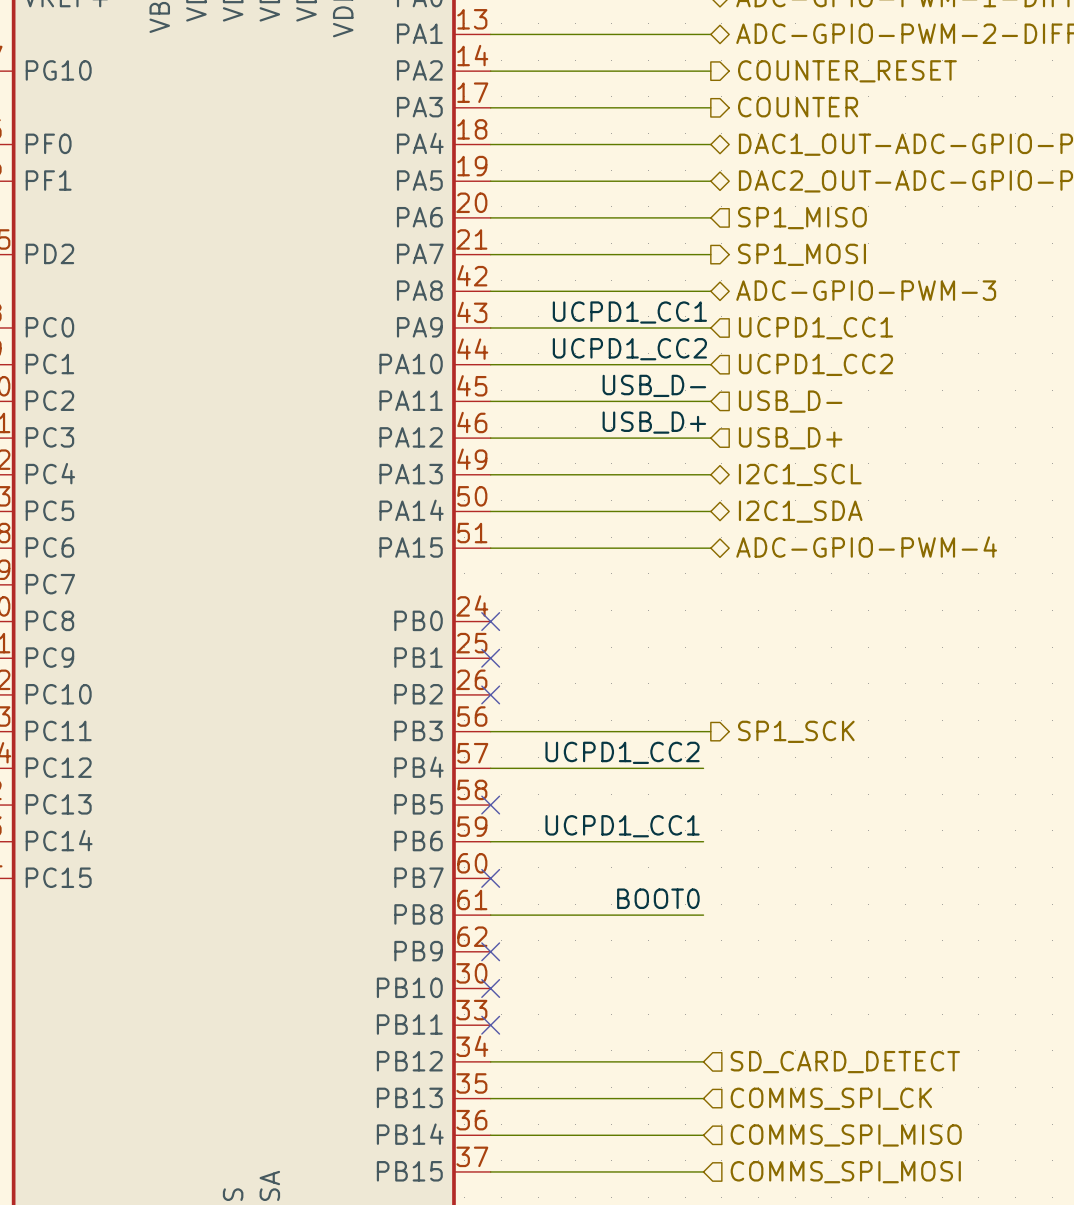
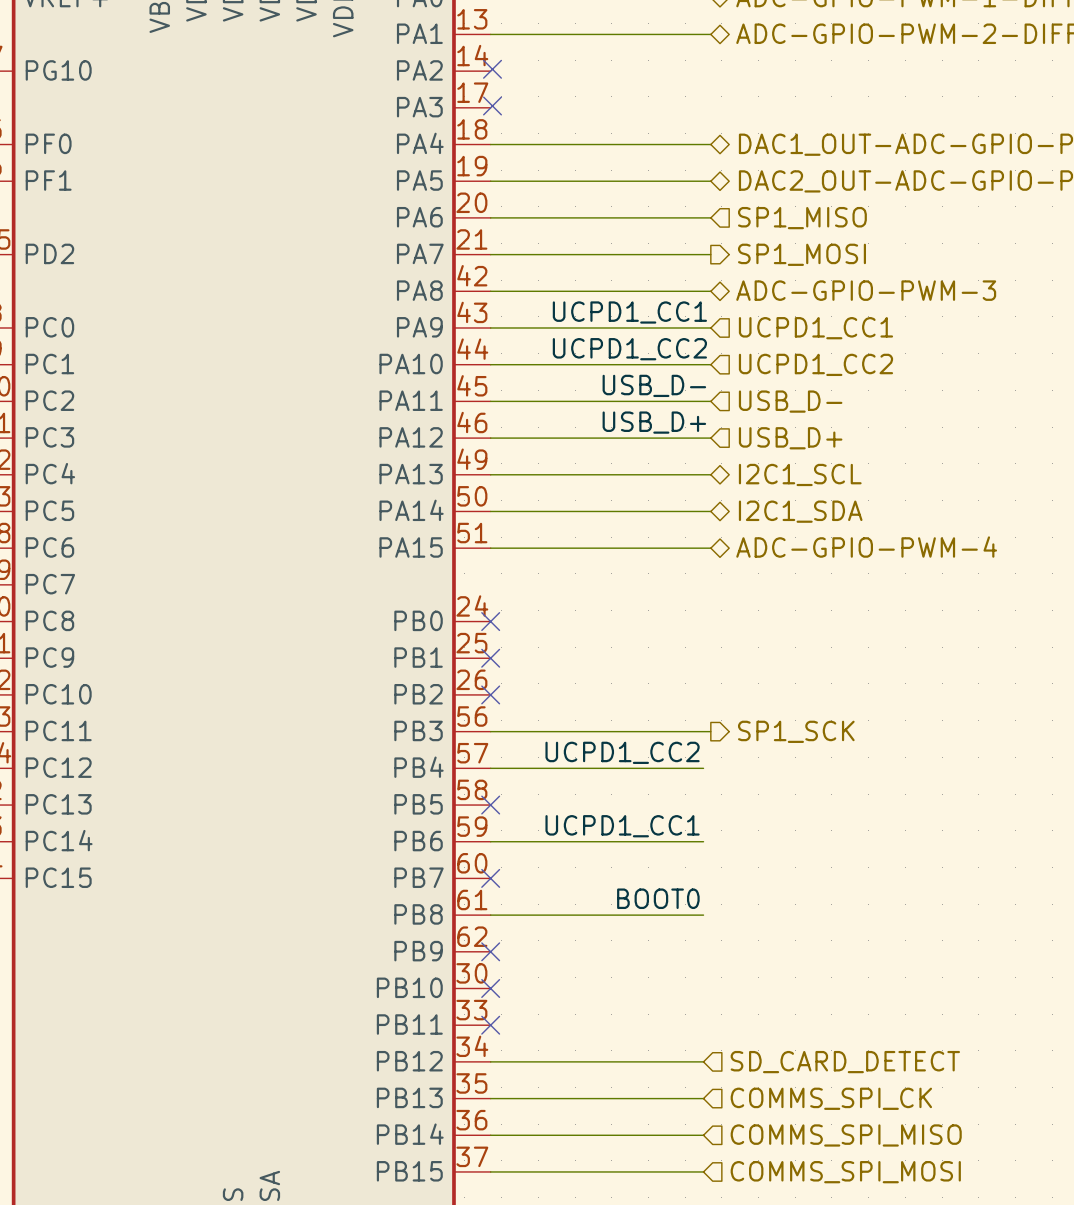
no-connect mark: none -> (492, 69)
wire: (490, 71) (710, 71) -> none
hierarchical label: COUNTER_RESET (847, 71) -> none
no-connect mark: none -> (492, 105)
wire: (490, 107) (710, 107) -> none
hierarchical label: COUNTER (798, 107) -> none

